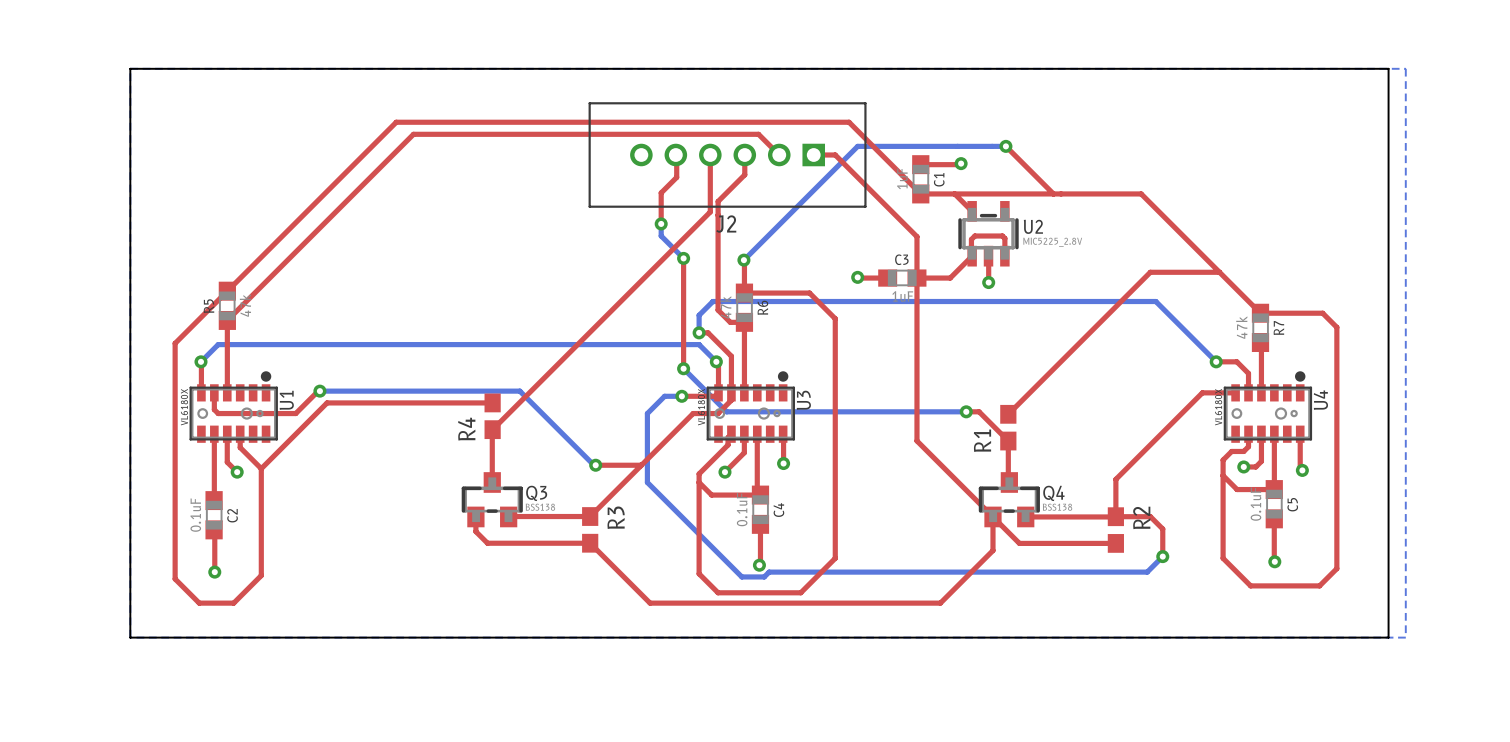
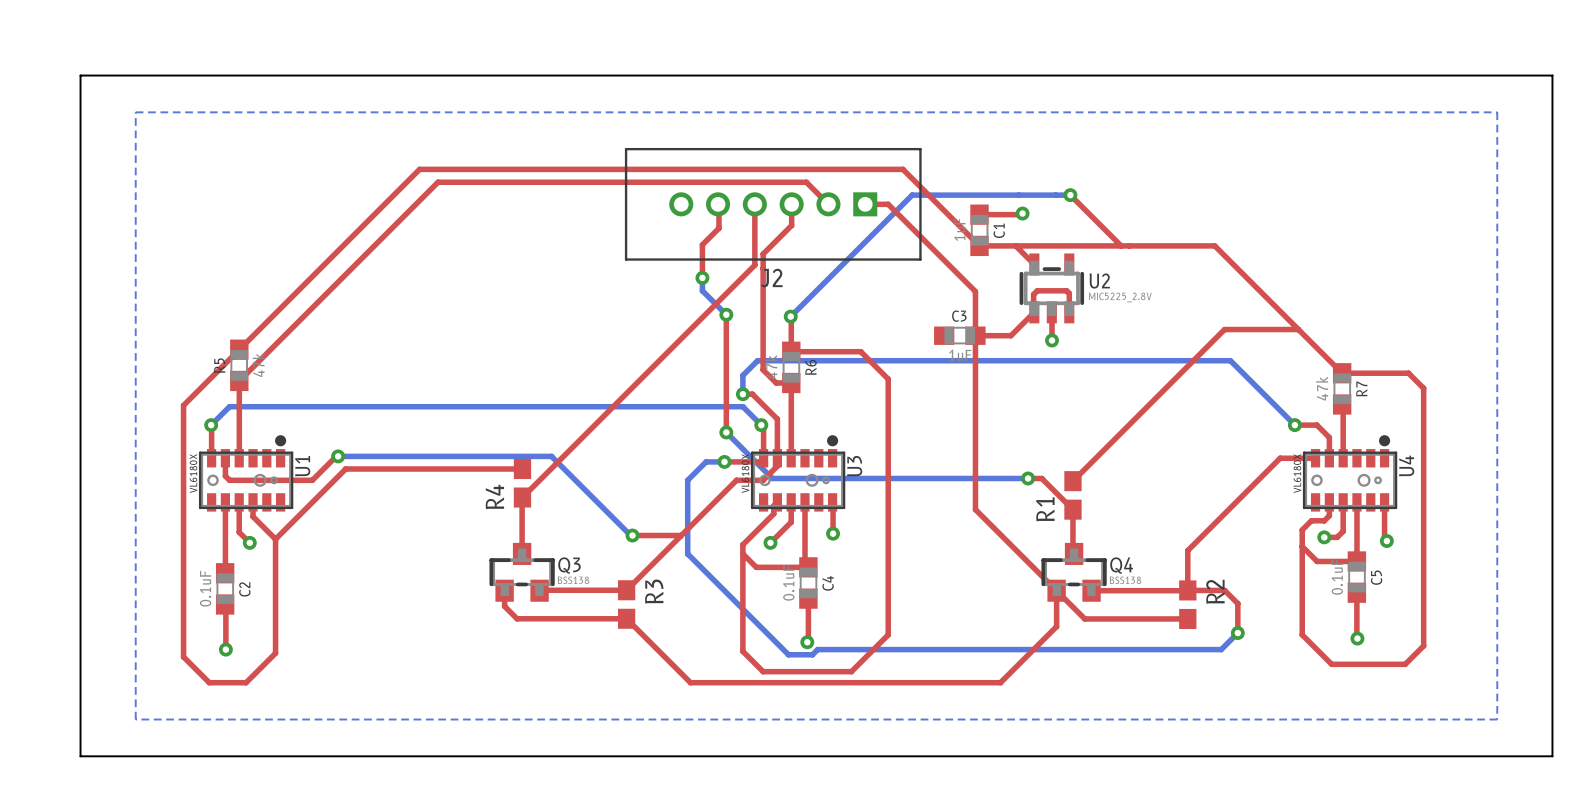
board edge: (130, 68) (1388, 68) (1388, 637) (130, 637) (130, 68) -> (80, 75) (80, 756) (1552, 756) (1552, 75) (80, 75)
top track: (857, 277) (887, 278) -> none
via: (857, 277) -> none

